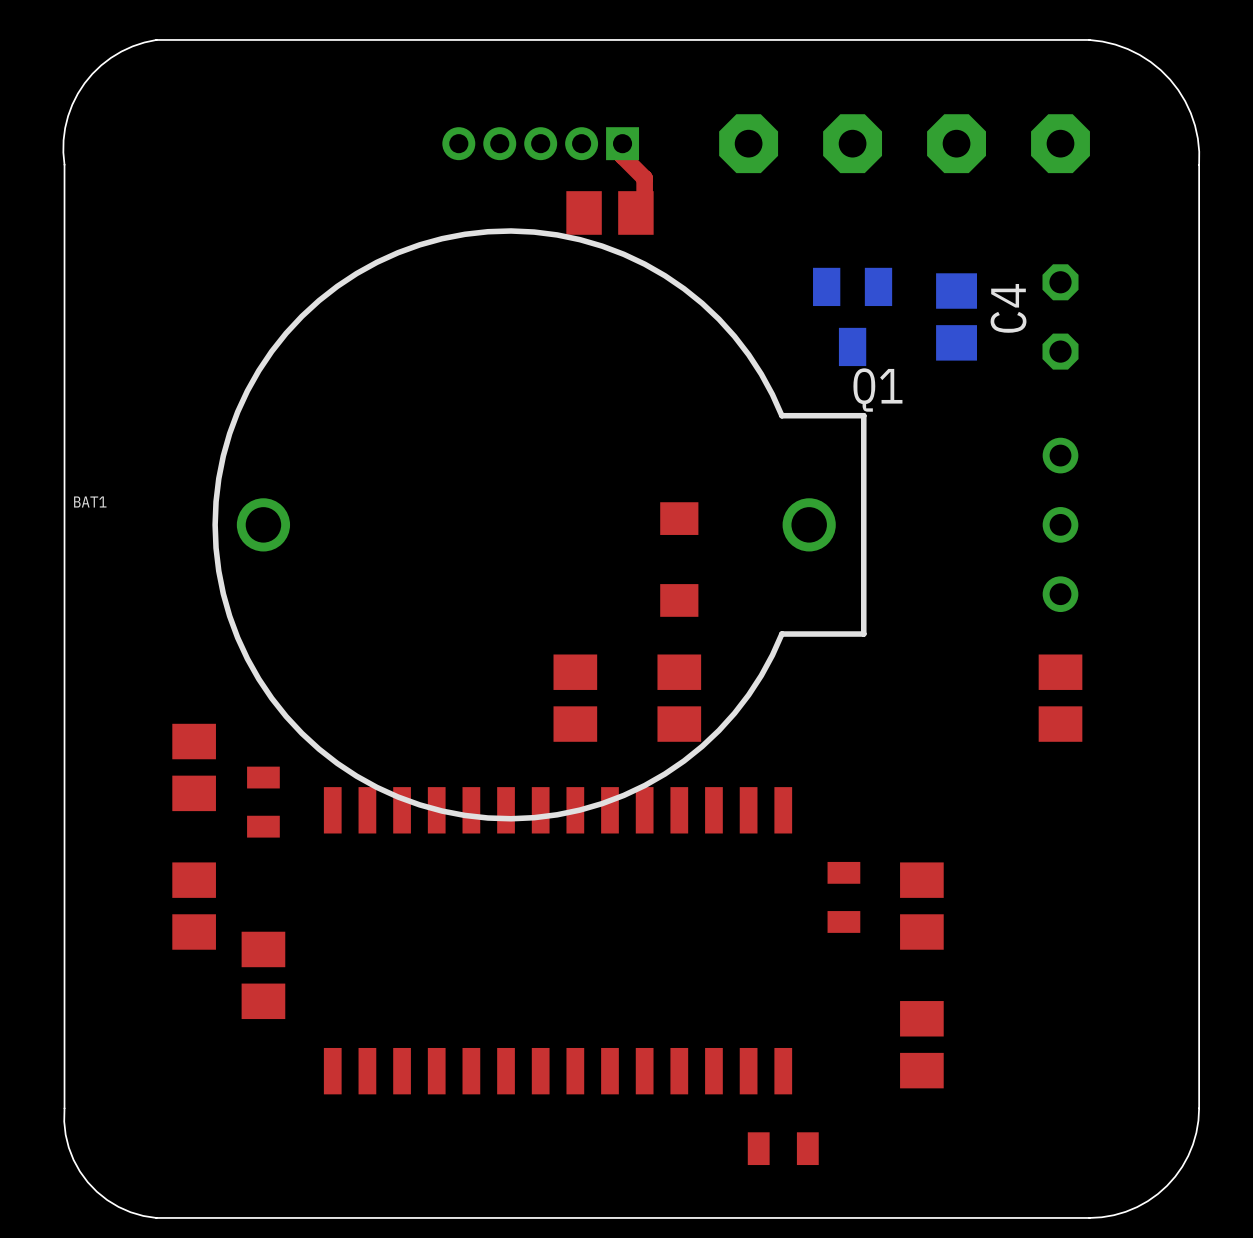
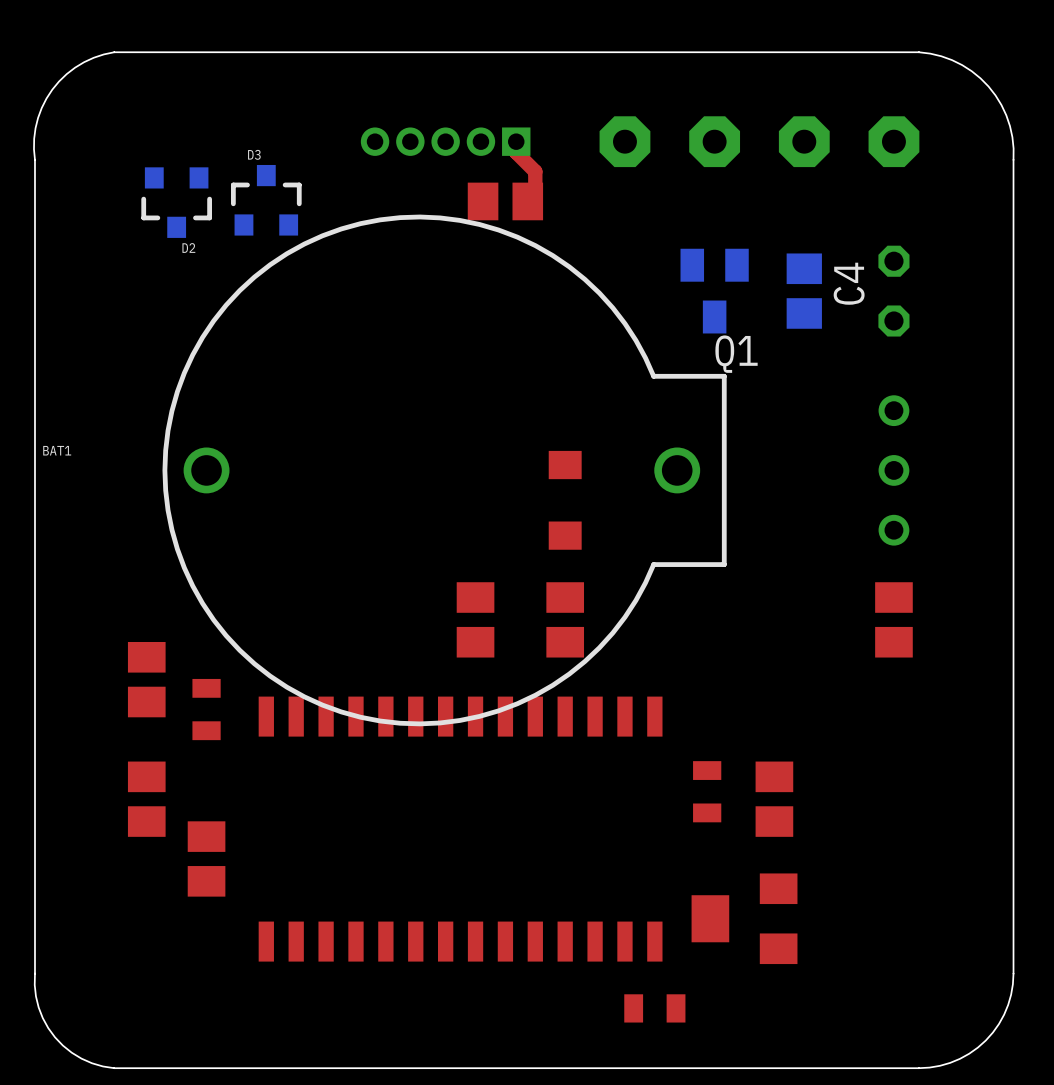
D3: none -> (266, 200)
D2: none -> (176, 202)
part: none -> (744, 918)
part: (921, 1044) -> none

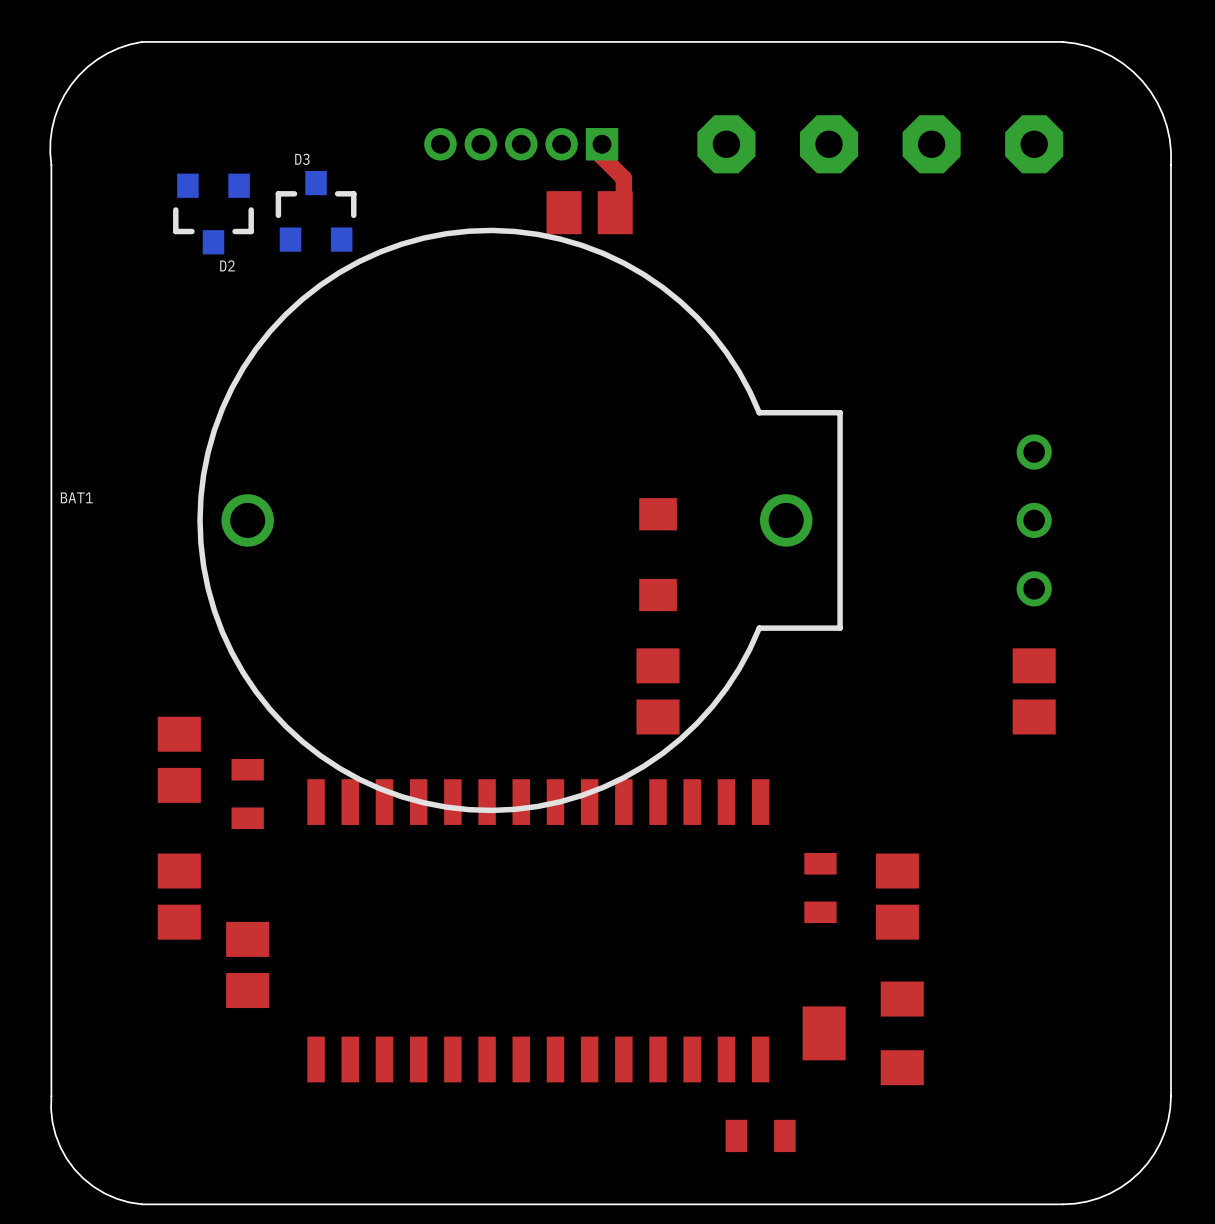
Q1: (714, 291) -> none
C4: (804, 291) -> none
part: (893, 291) -> none
part: (475, 619) -> none

